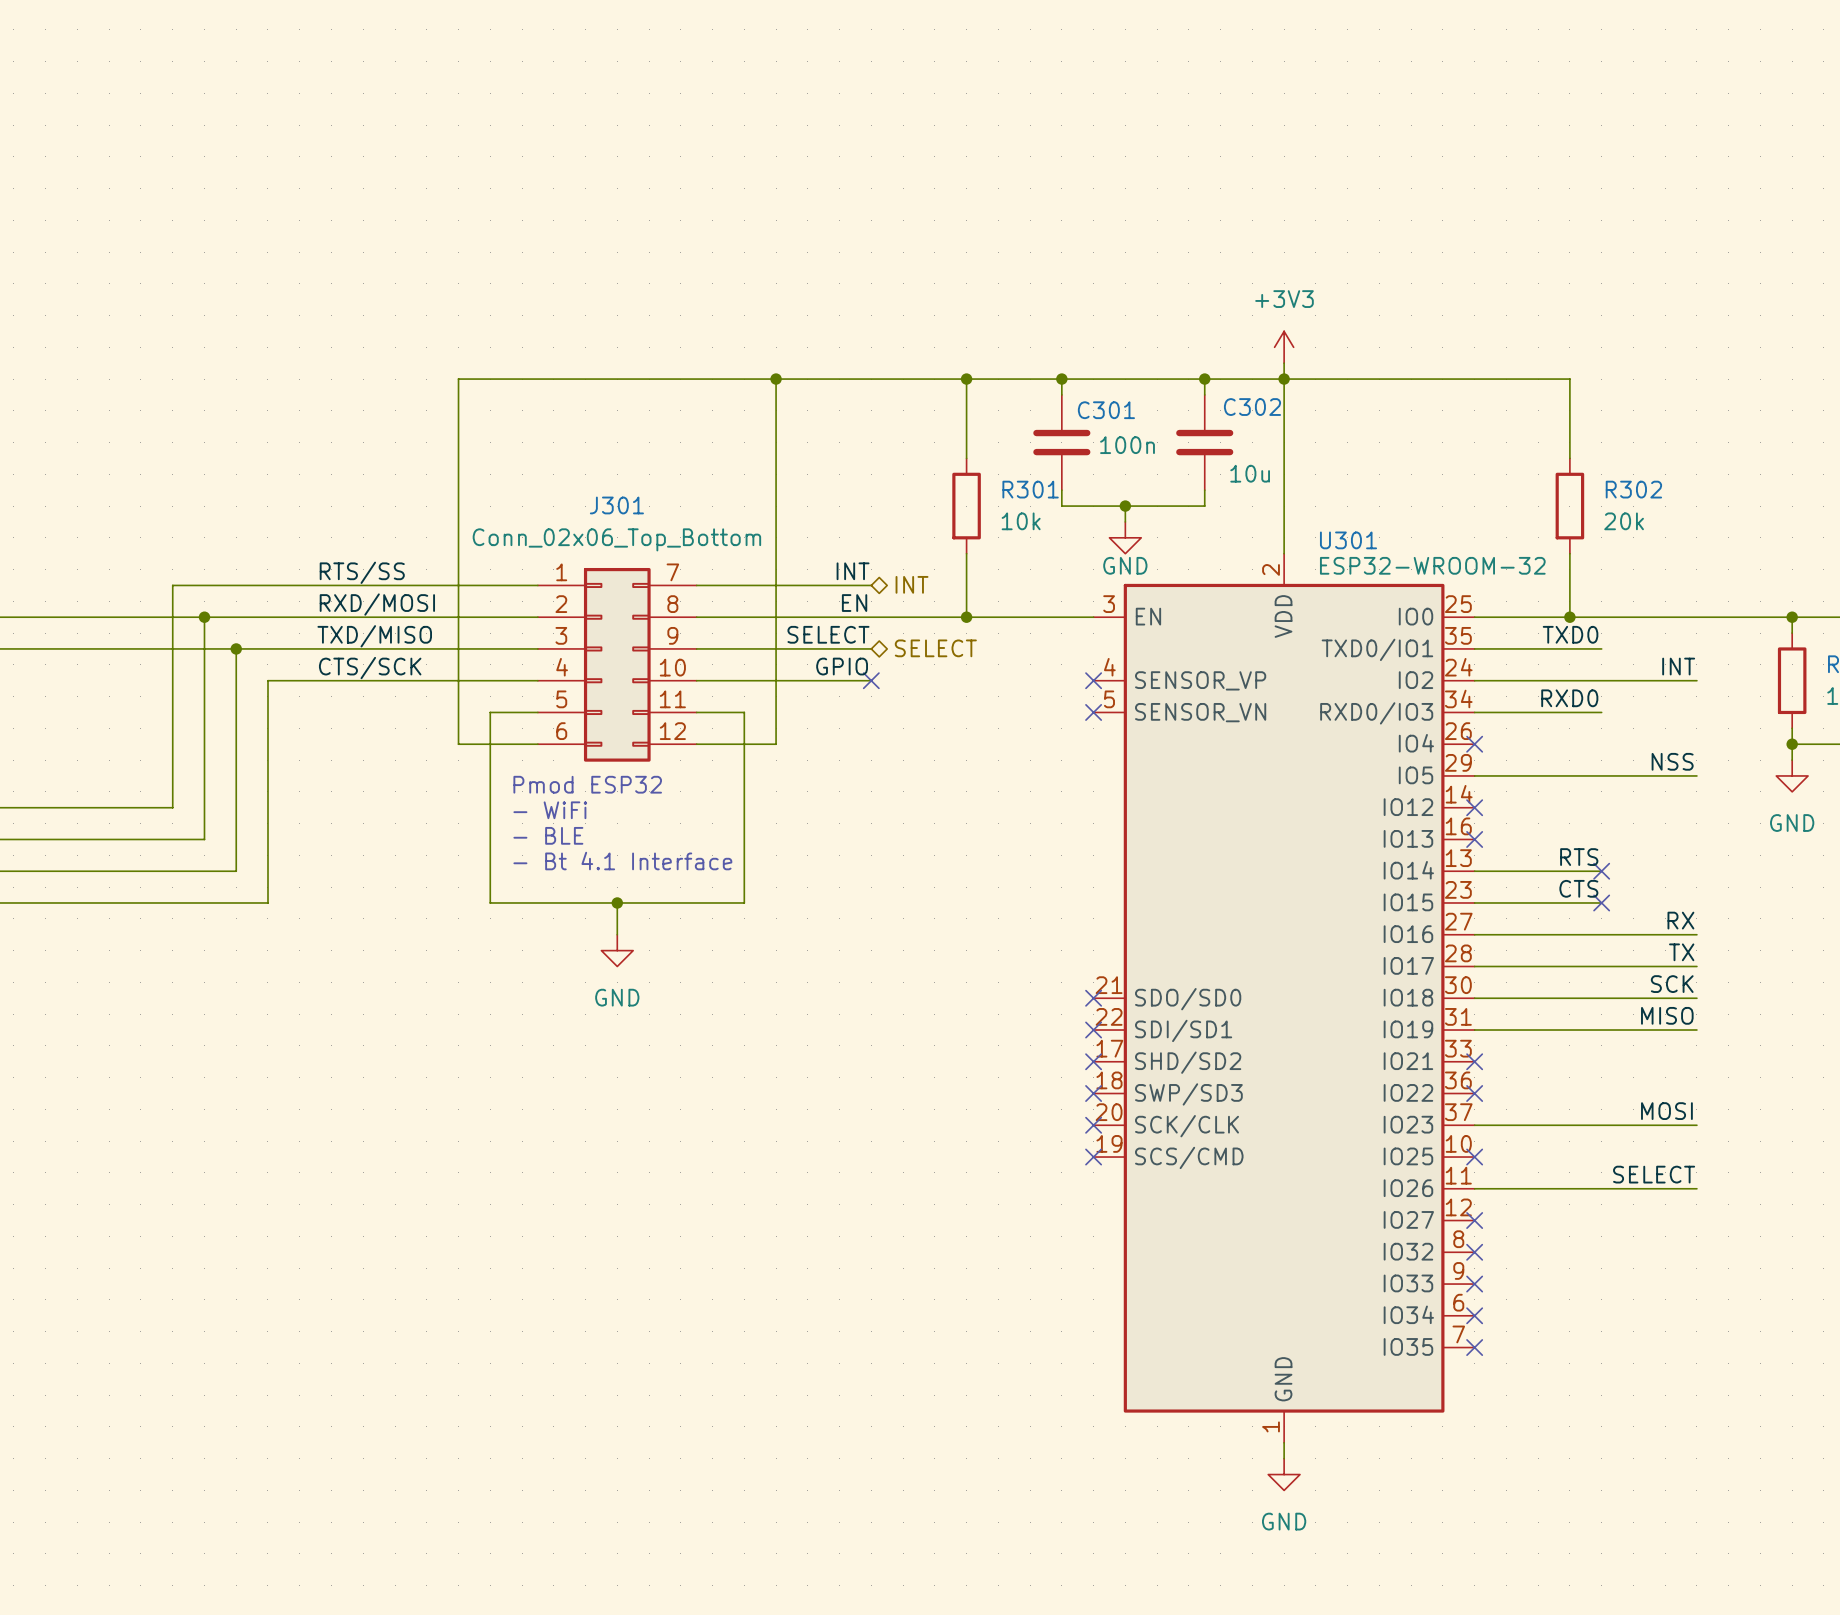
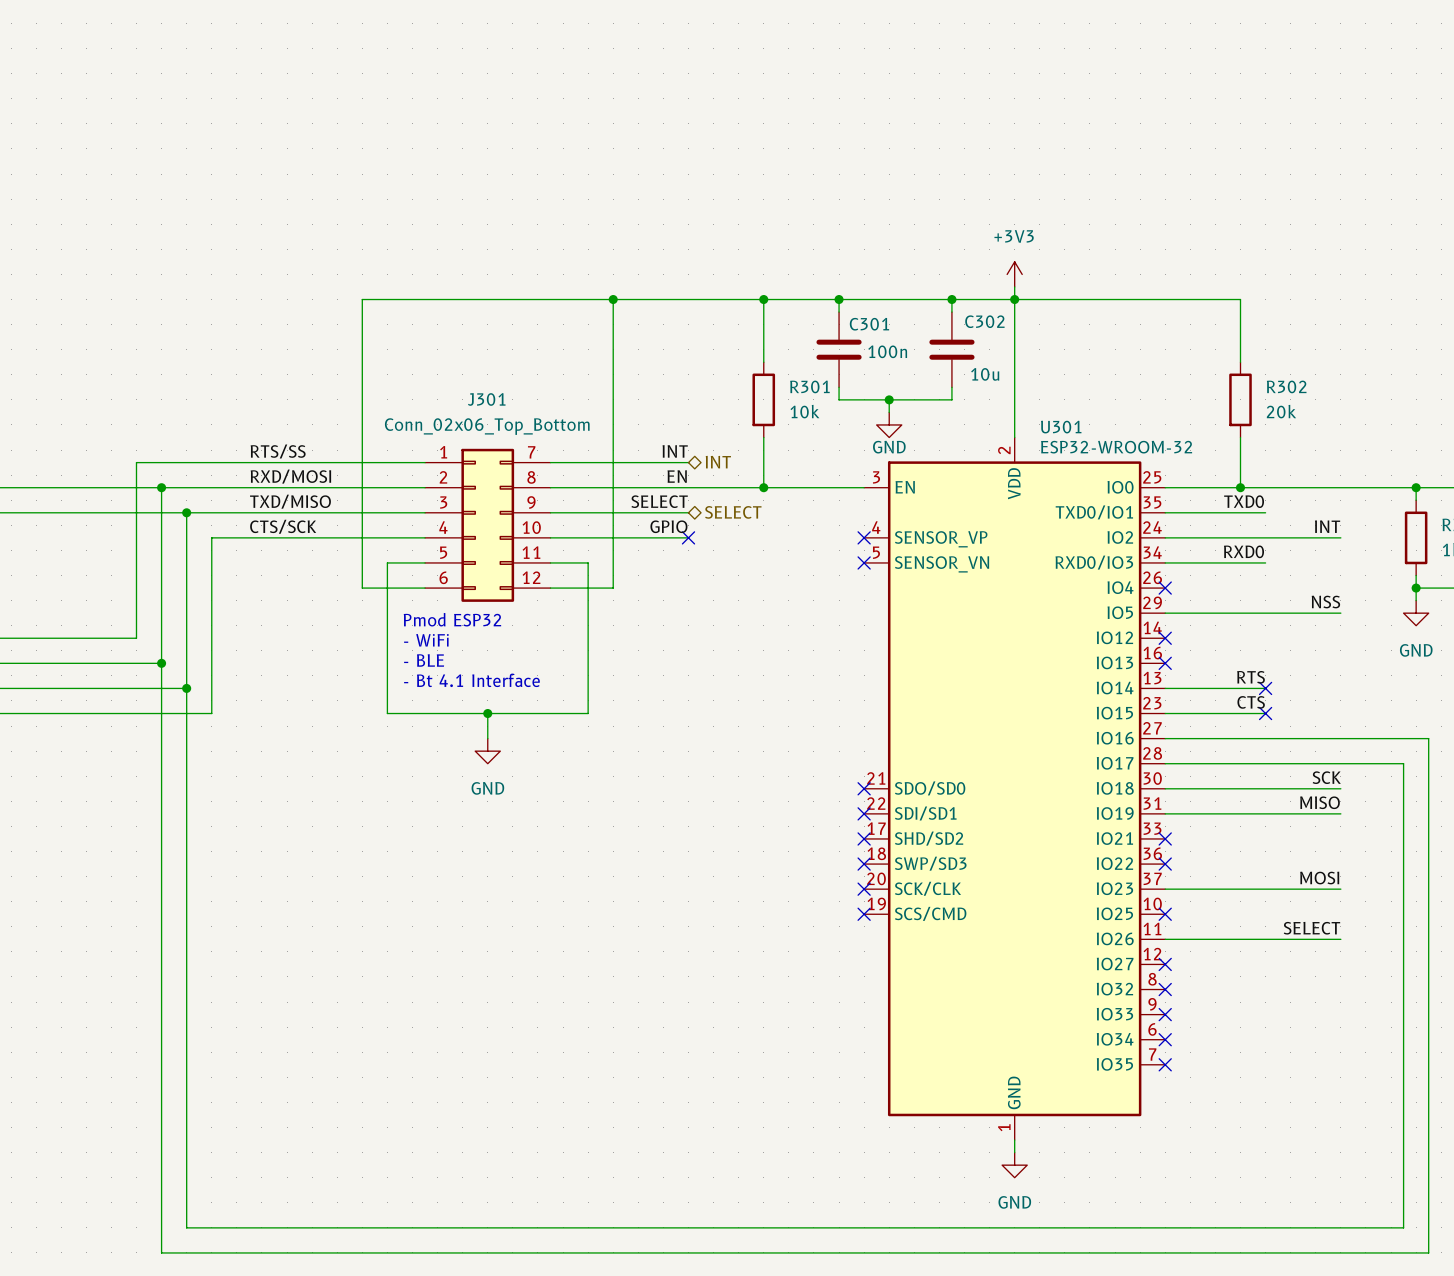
wire: none -> (161, 663) (161, 1252) (1428, 1252) (1428, 738) (1340, 738)
junction: none -> (161, 663)
wire: none -> (186, 688) (186, 1227) (1403, 1227) (1403, 763) (1340, 763)
junction: none -> (186, 688)
label: RX (1680, 920) -> none
label: TX (1681, 952) -> none

